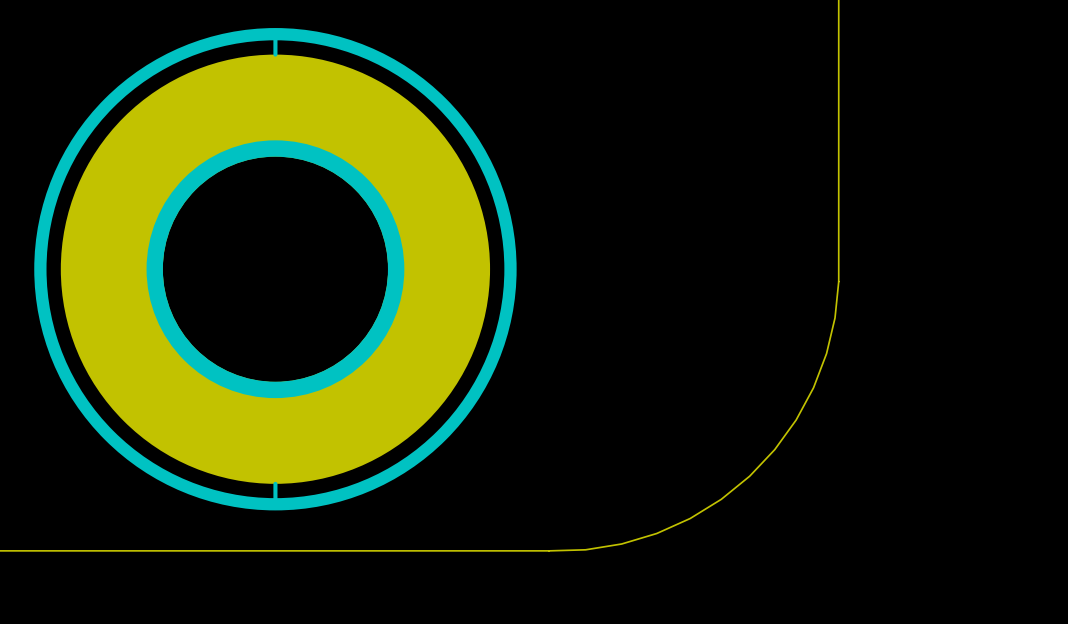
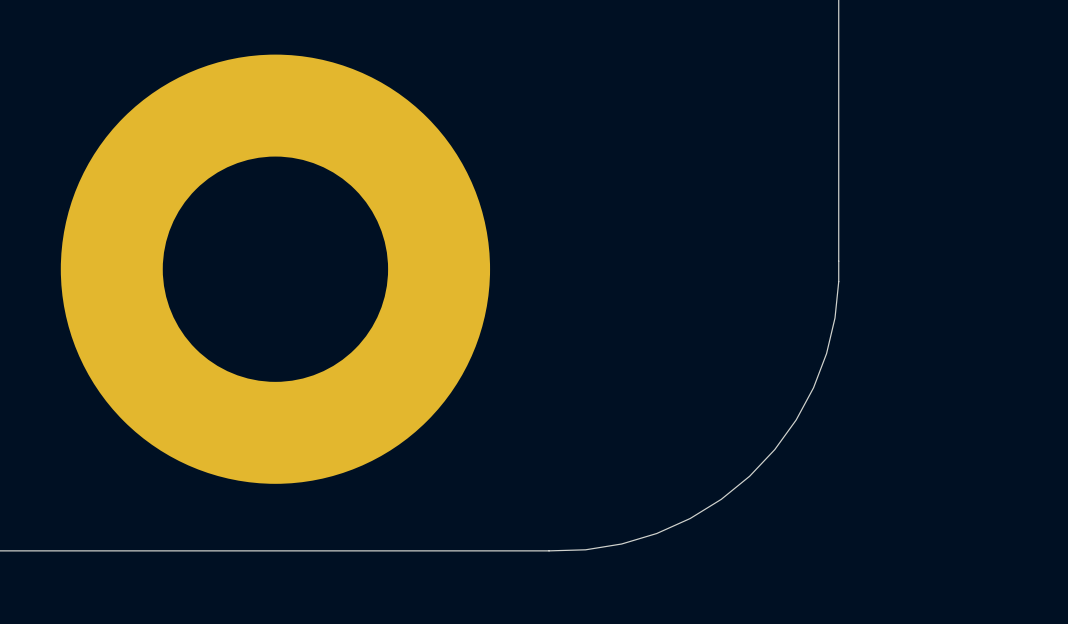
part side: bottom (275, 269) -> top (275, 269)

